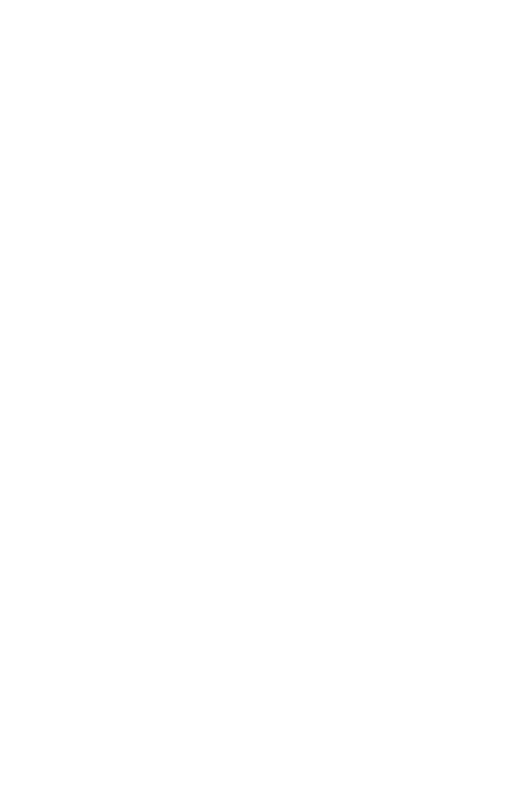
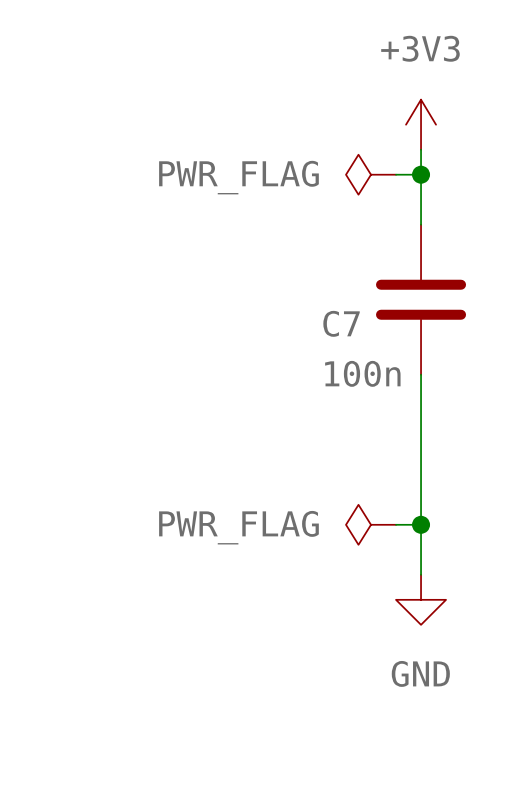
power symbol: none -> +3V3 (421, 124)
wire: none -> (421, 149) (421, 224)
power symbol: none -> PWR_FLAG (371, 174)
wire: none -> (396, 174) (421, 174)
junction: none -> (421, 174)
C7: none -> 100n (421, 299)
wire: none -> (421, 374) (421, 574)
power symbol: none -> PWR_FLAG (371, 524)
wire: none -> (396, 524) (421, 524)
junction: none -> (421, 524)
power symbol: none -> GND (421, 599)

